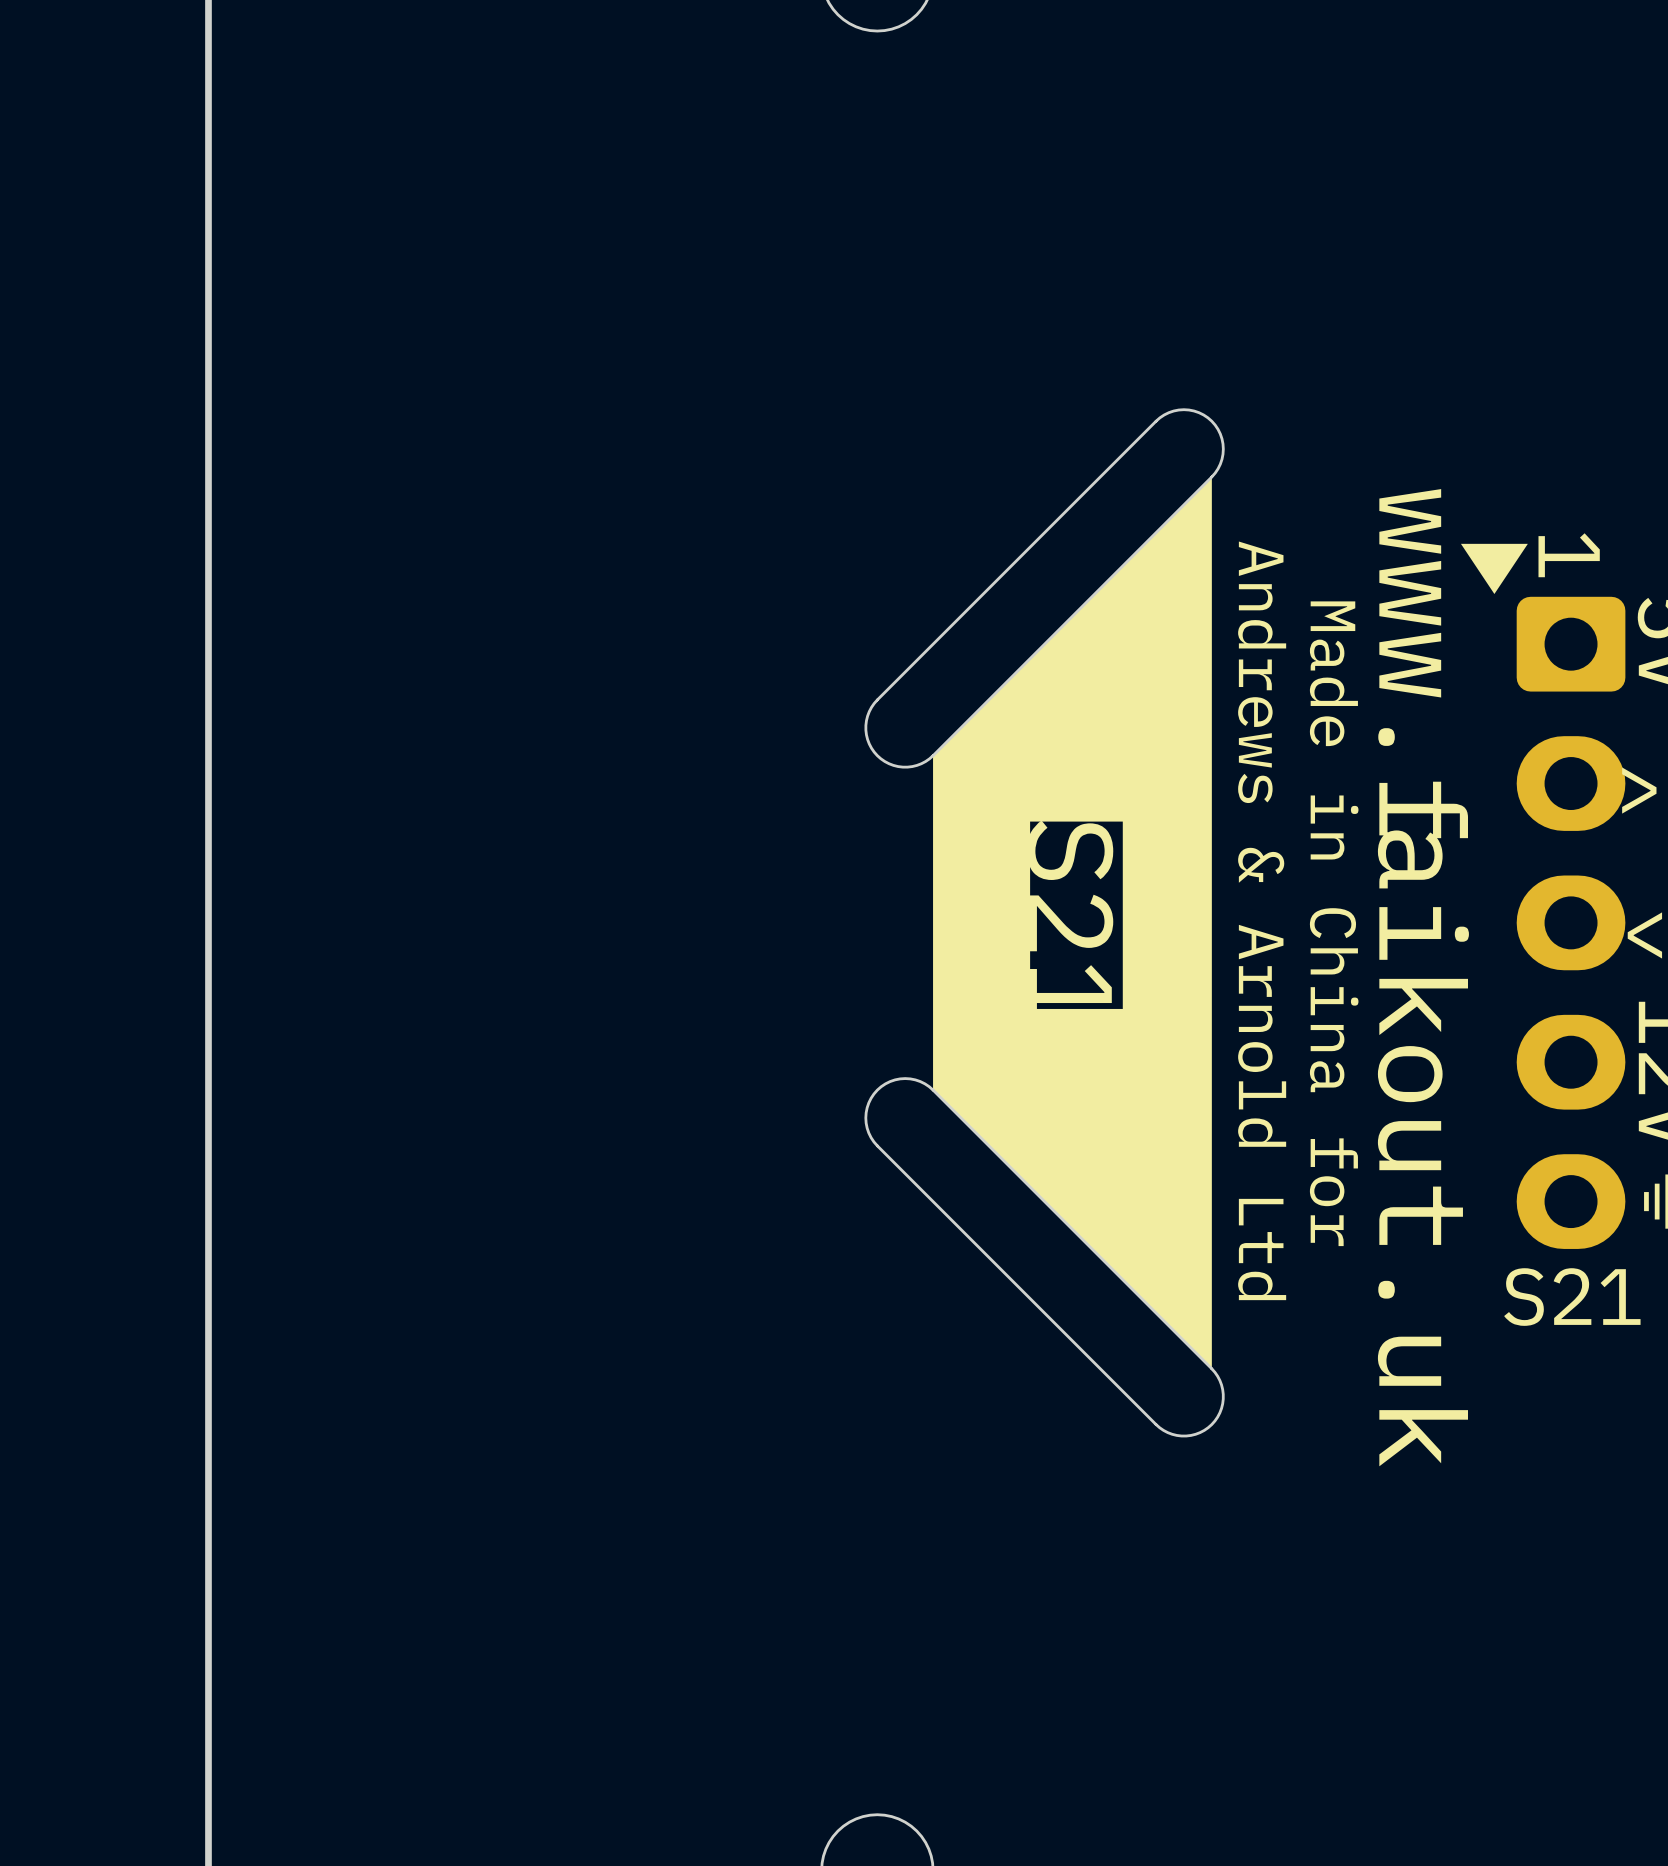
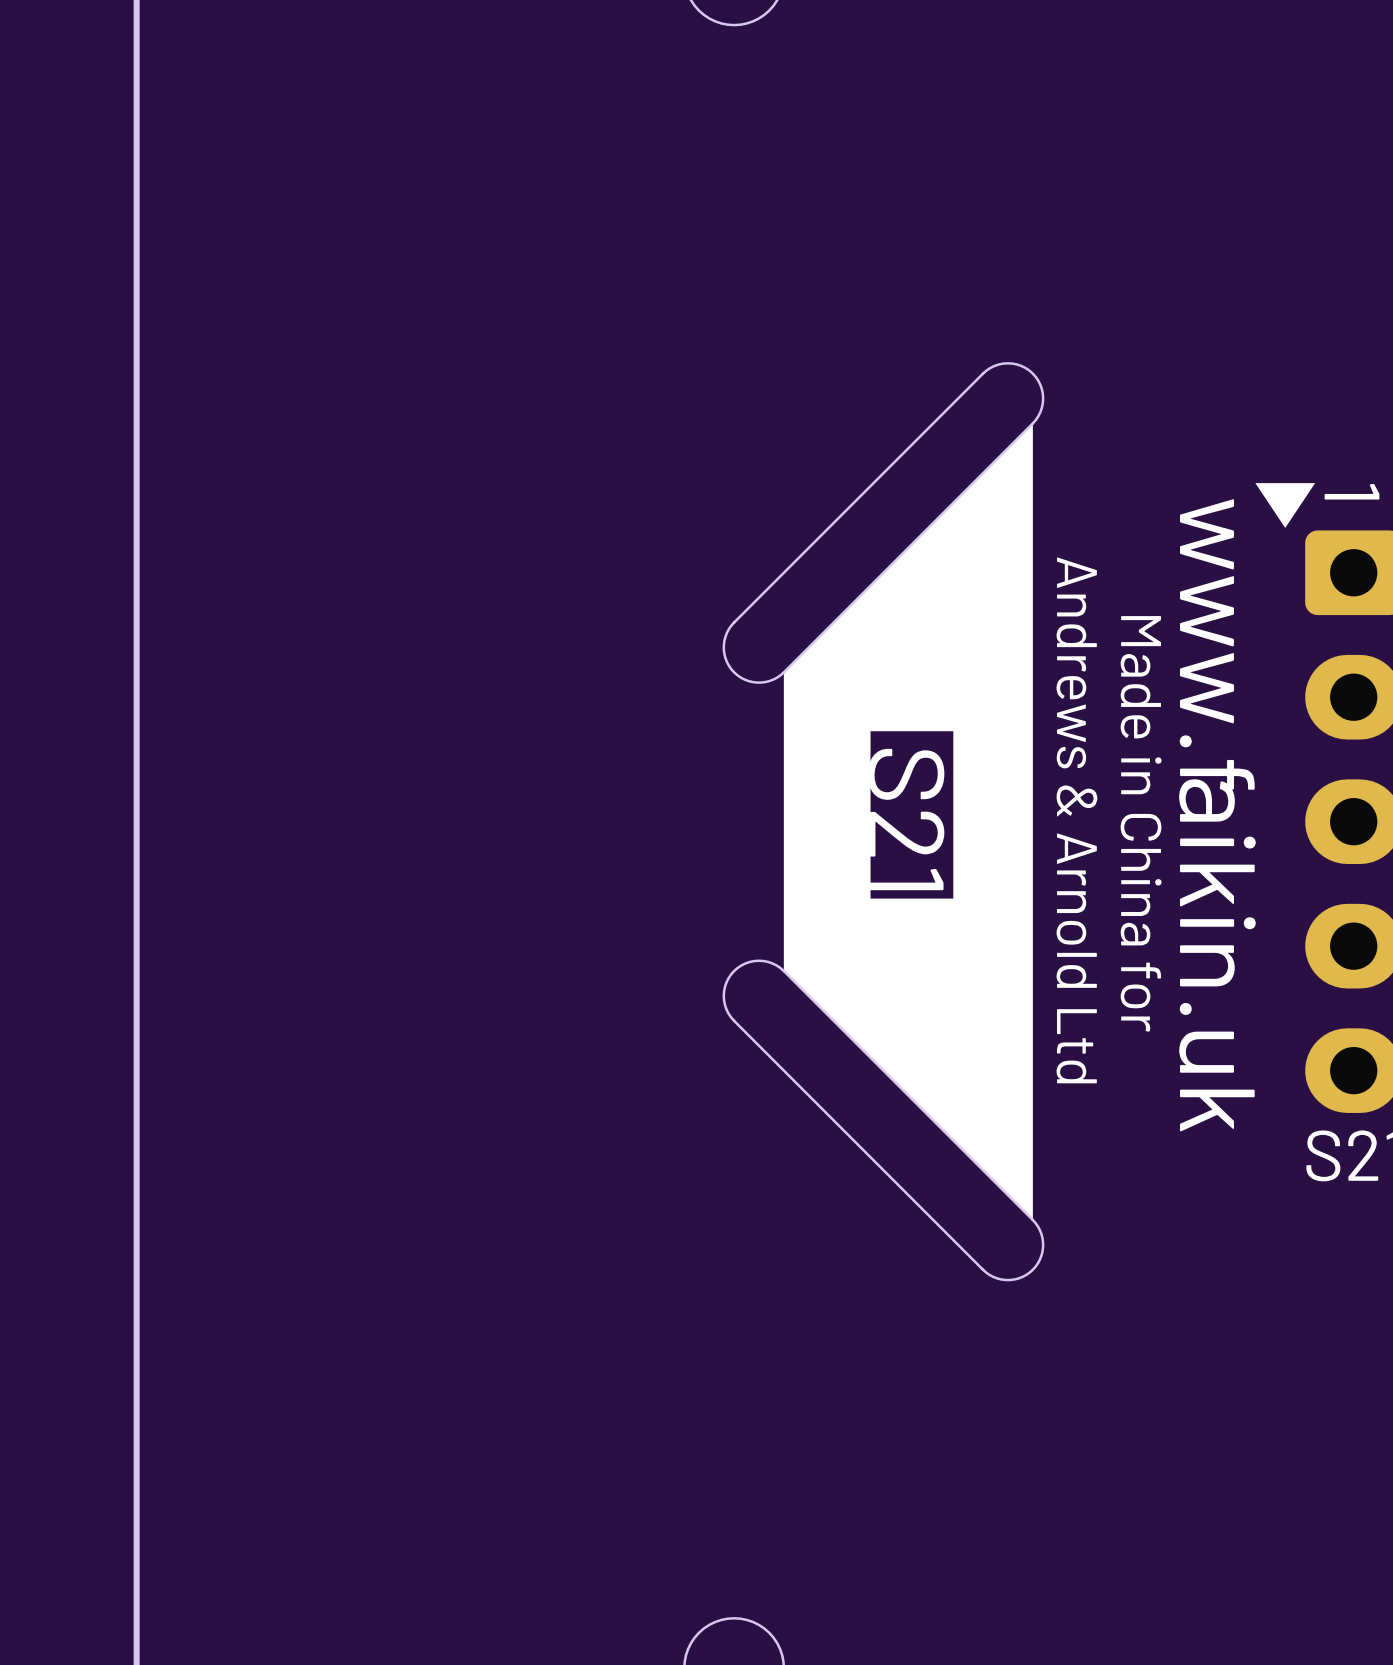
text position: www.f (1423, 663) -> www.f (1217, 644)
text: aikout.uk (1423, 1148) -> aikin.uk (1217, 955)

